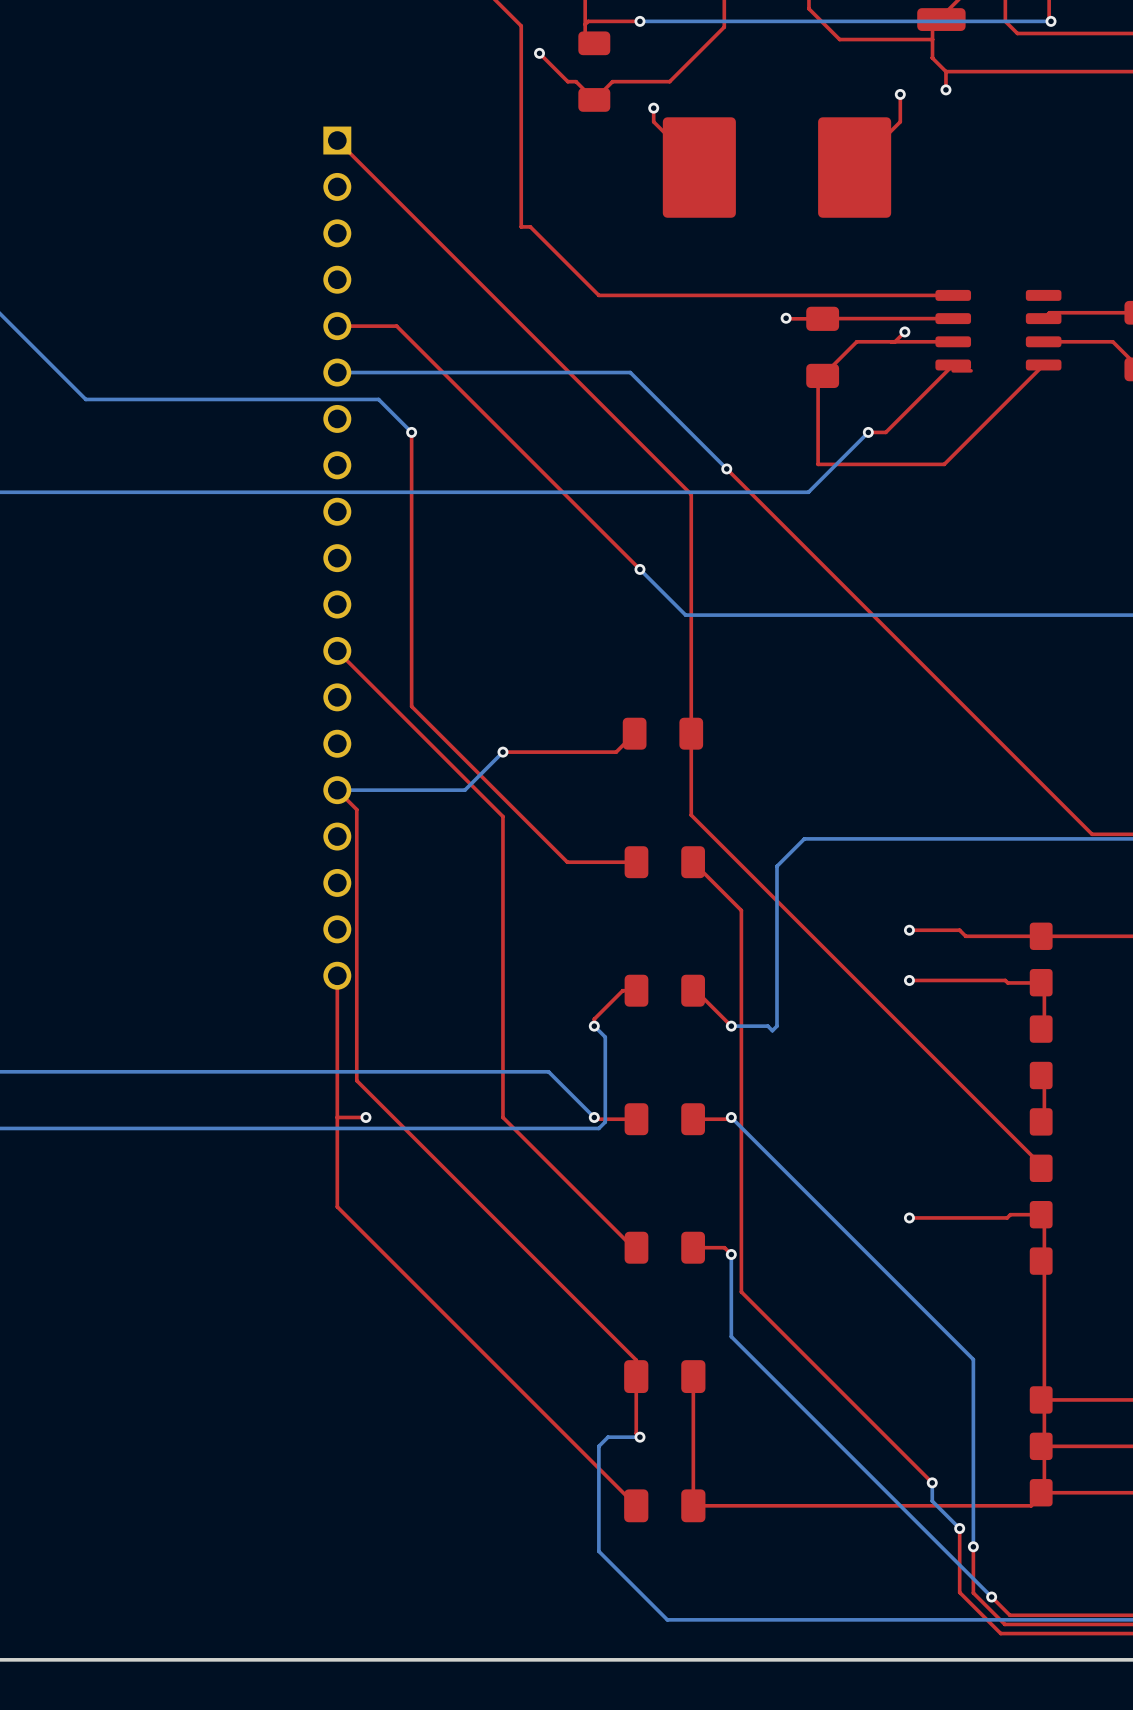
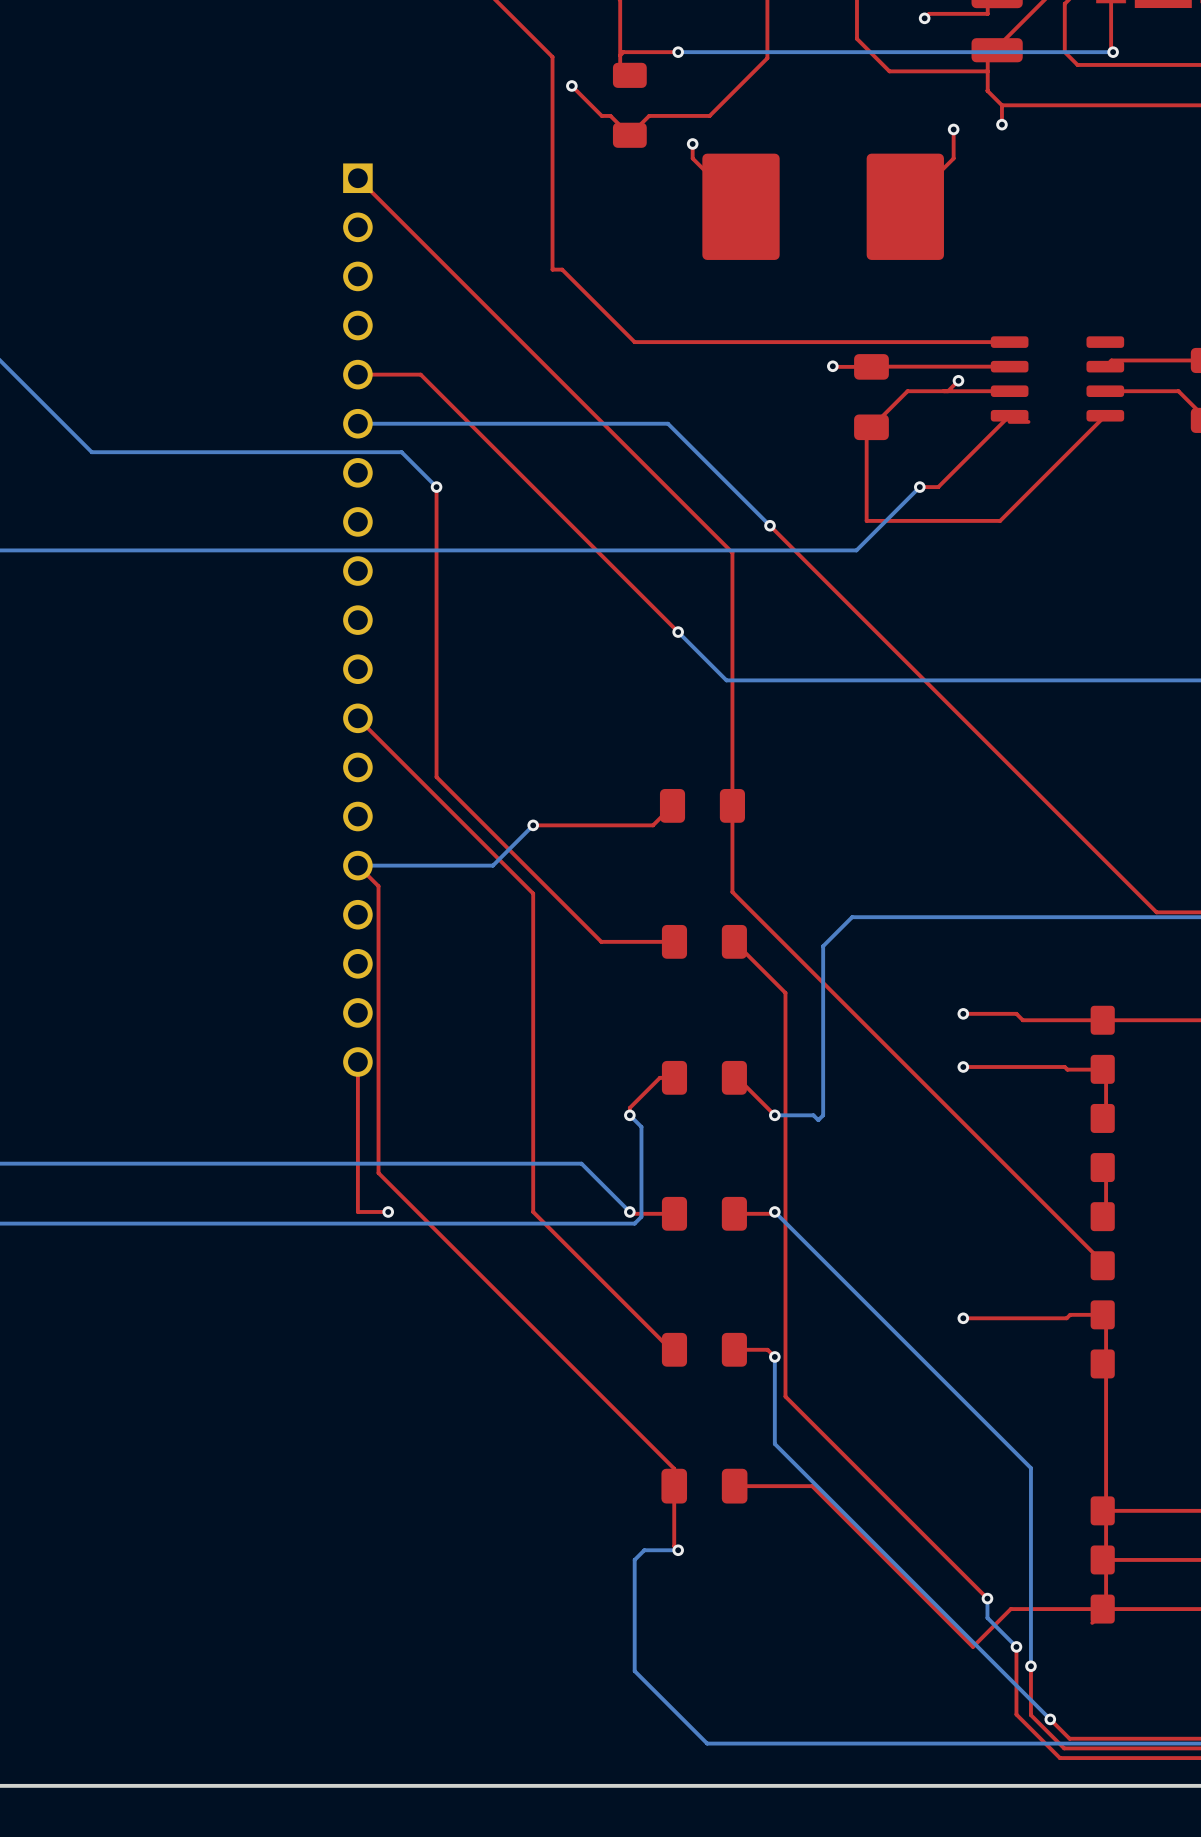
top track: (337, 1117) (337, 1206) (636, 1505) -> none
top track: (693, 1376) (693, 1505) (1031, 1505) -> (734, 1486) (812, 1486) (972, 1646) (1010, 1609) (1102, 1609)
part: (664, 1505) -> none

